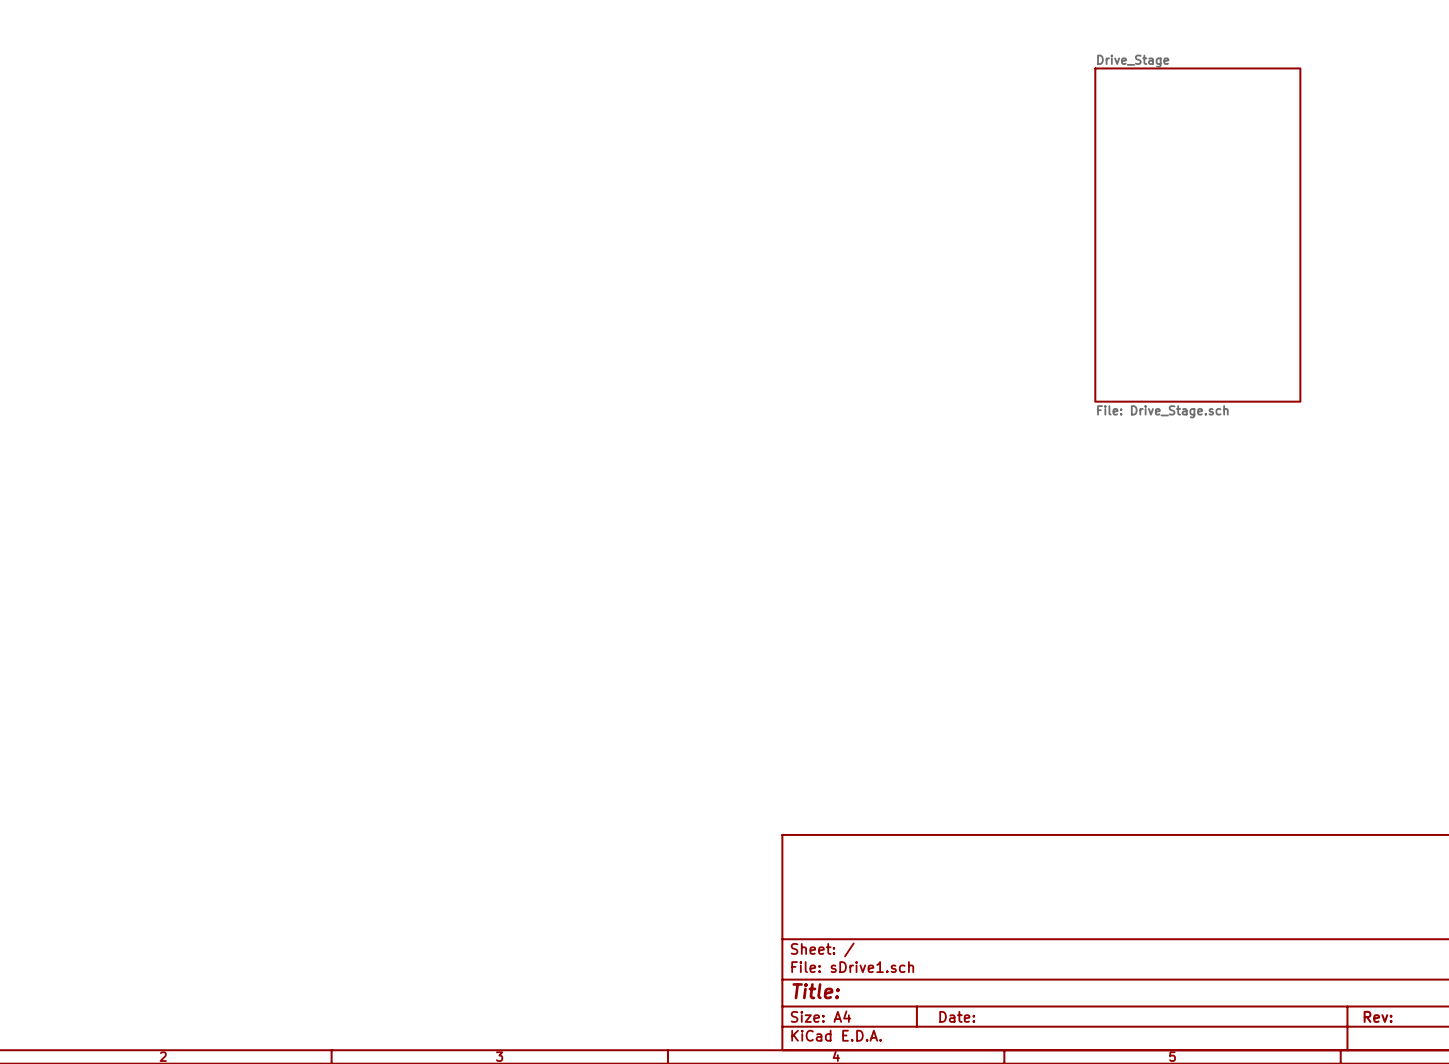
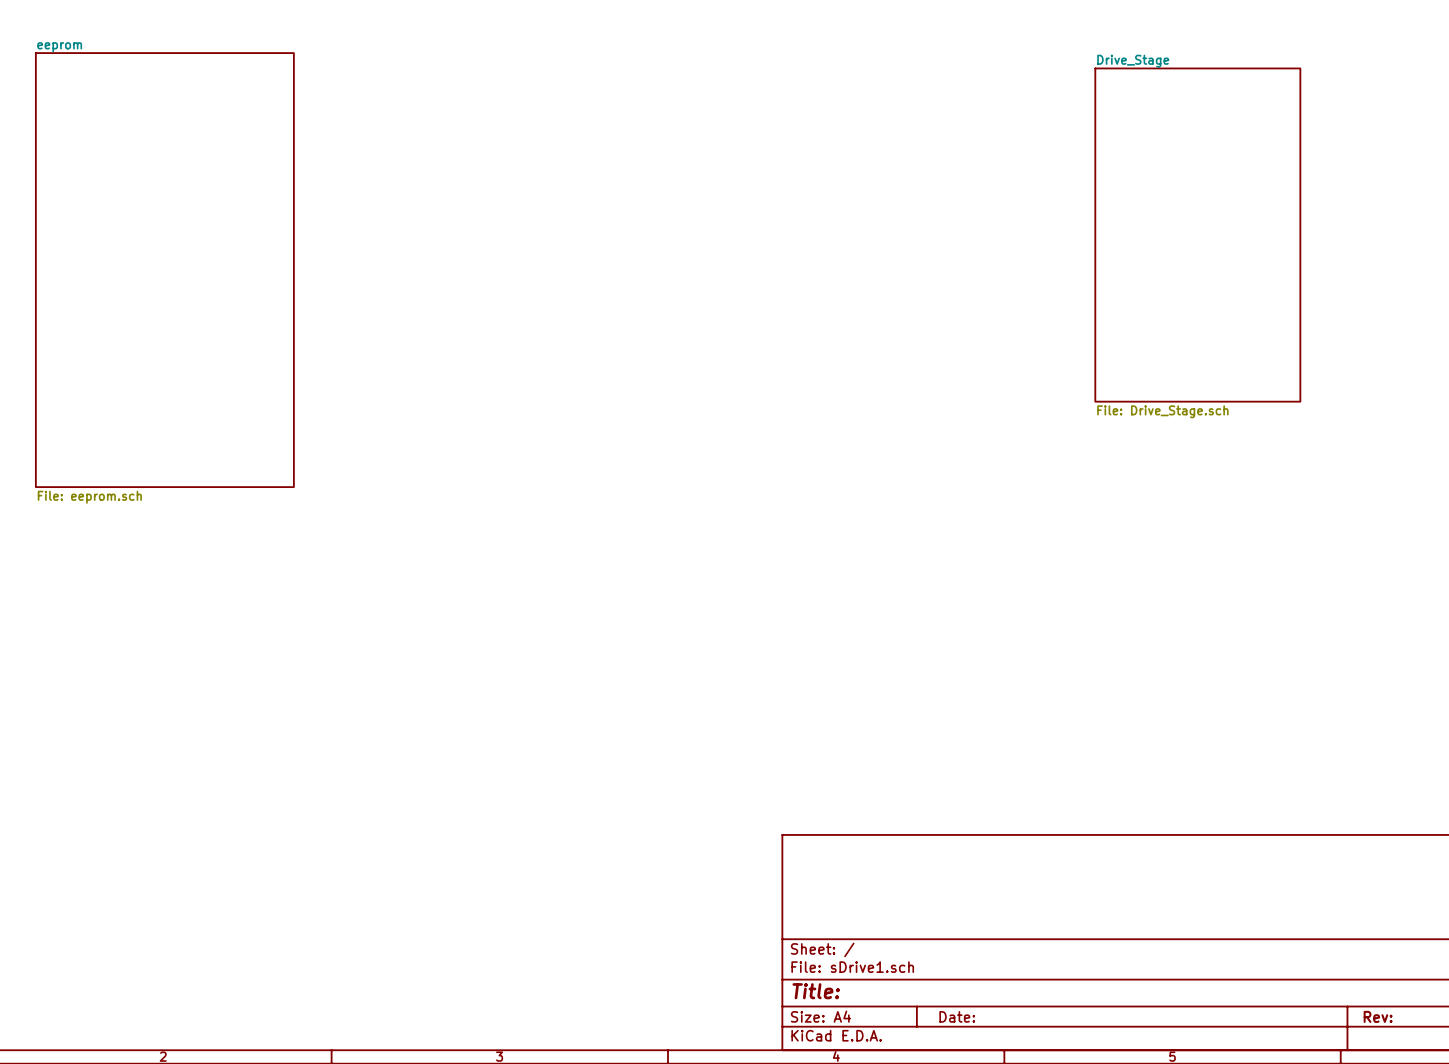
sheet eeprom: none -> File: eeprom.sch (164, 270)

